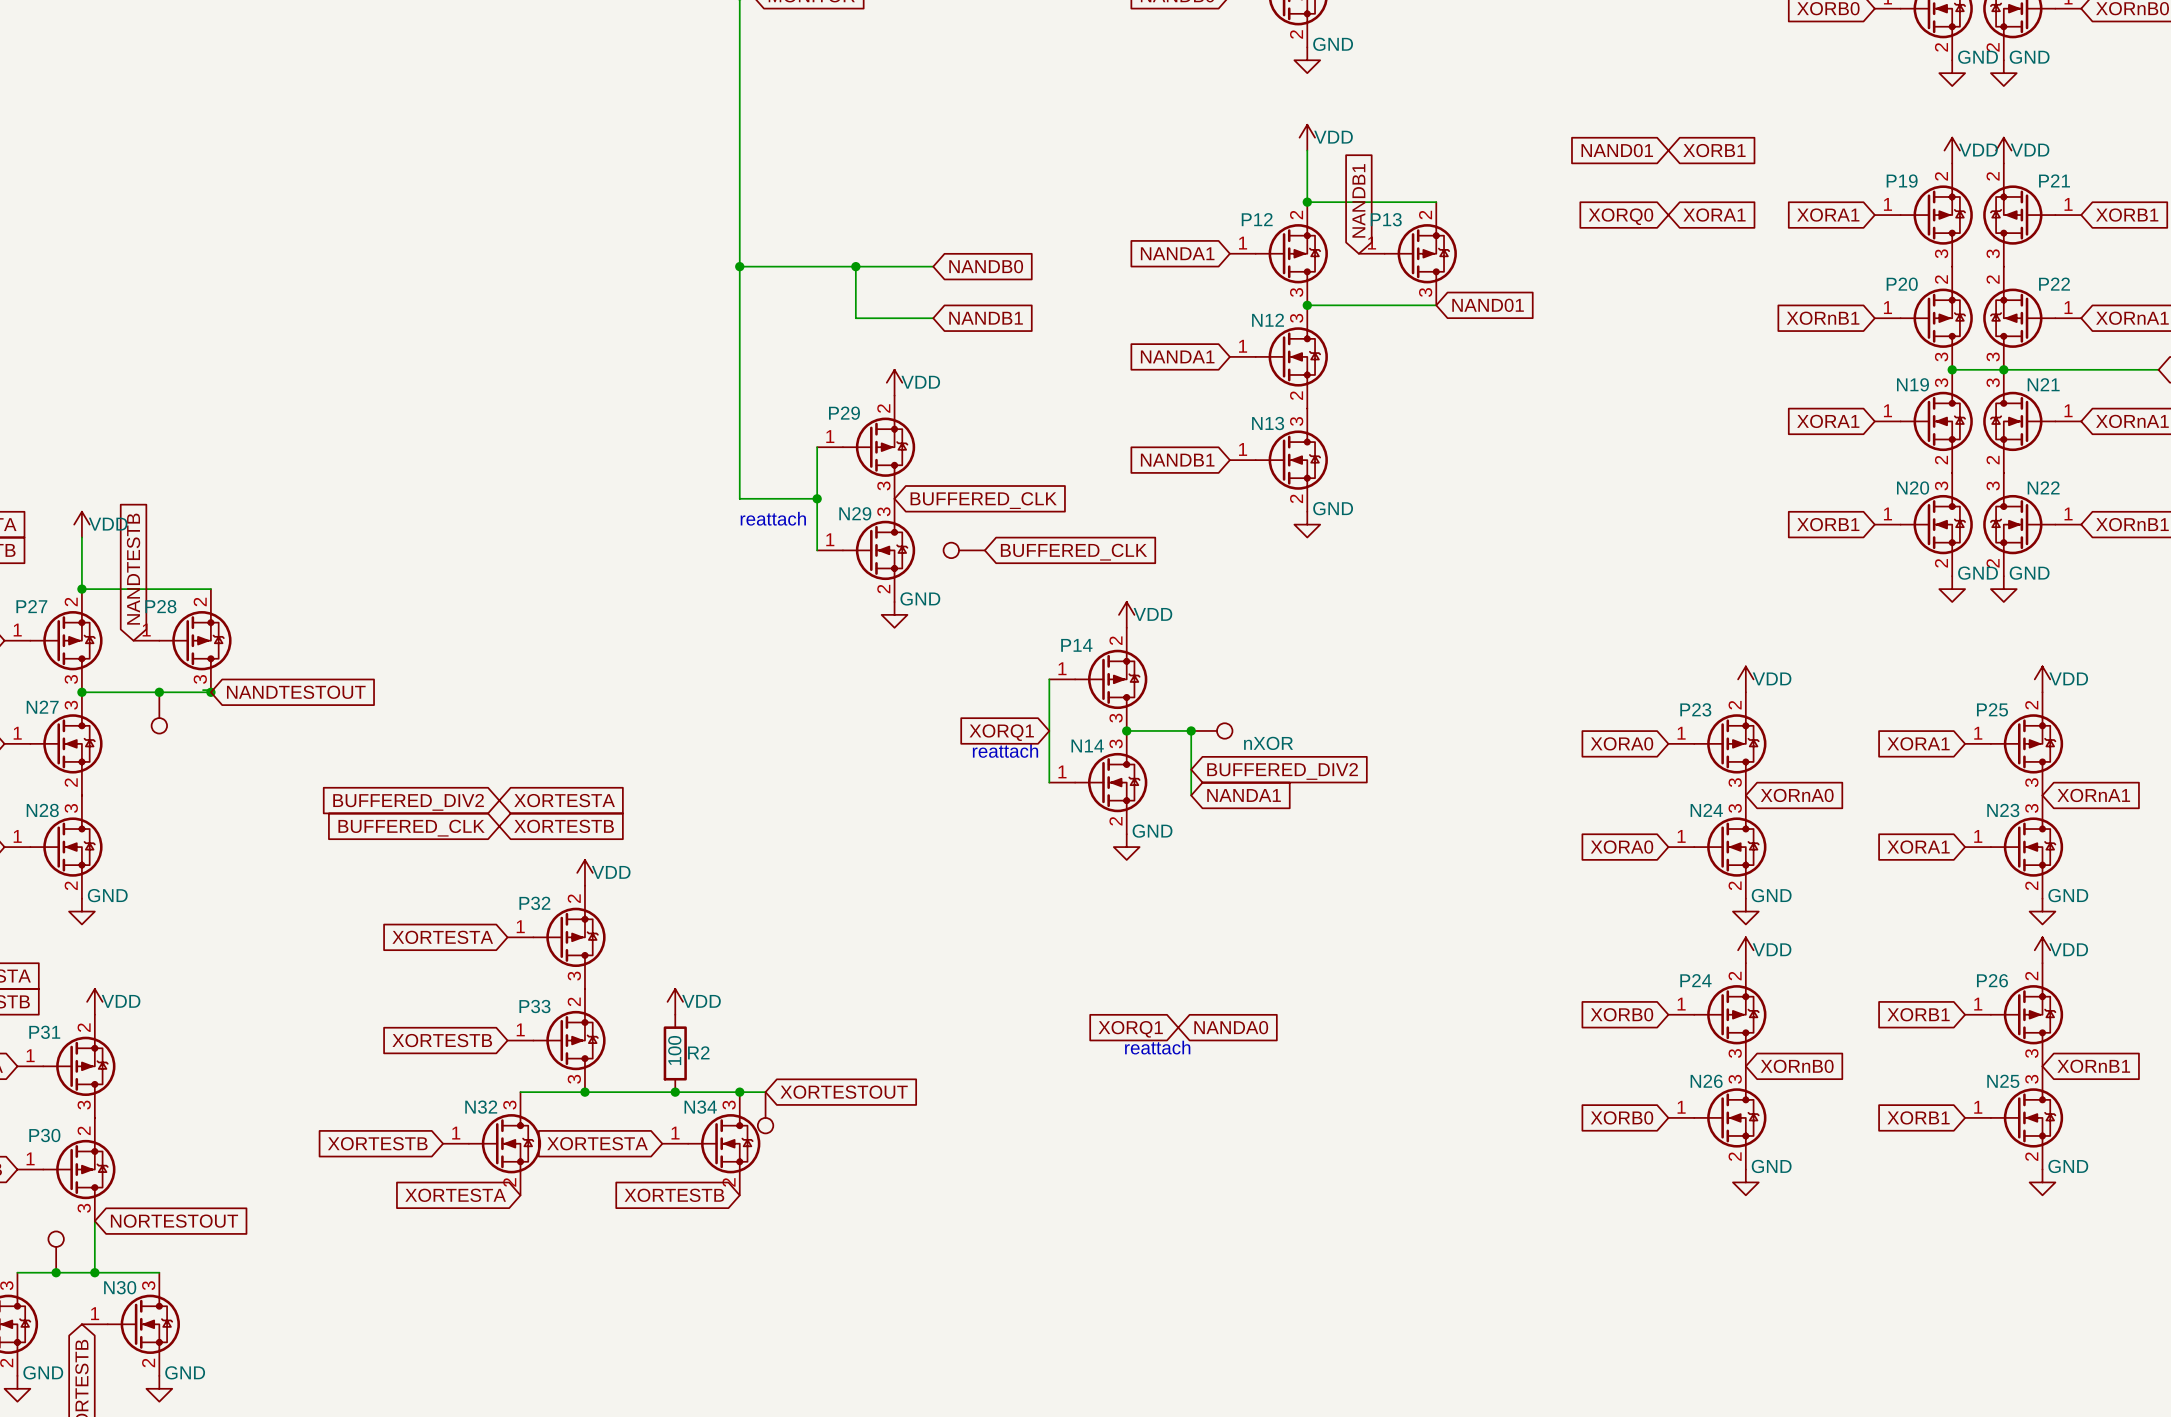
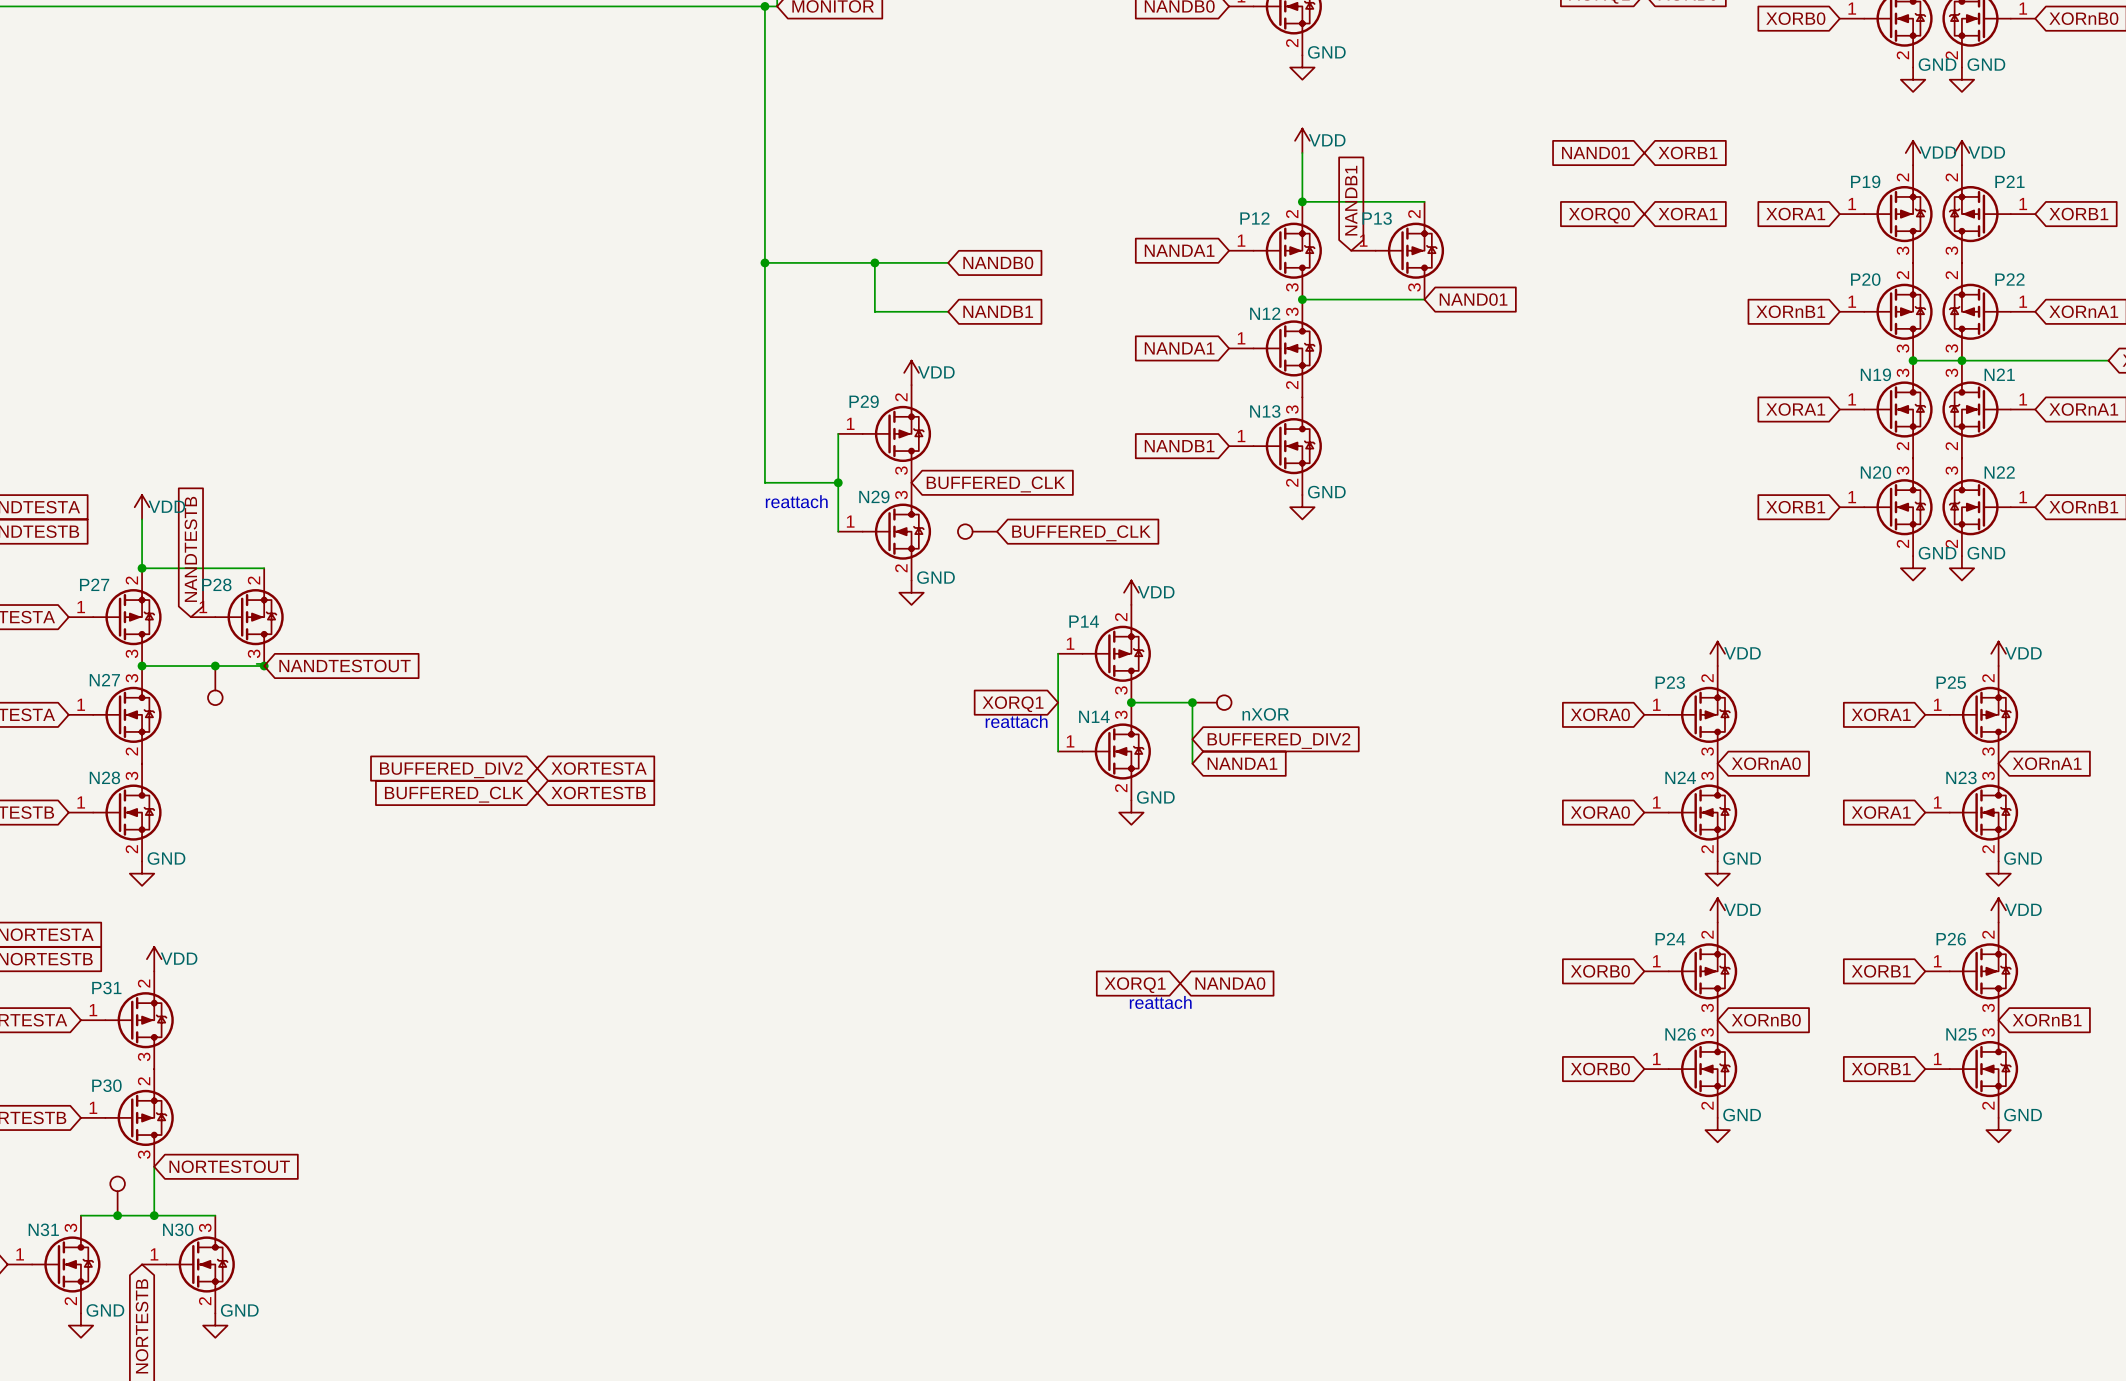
power symbol: VDD (584, 872) -> none
global label: XORTESTA (442, 937) -> none
P32: (556, 937) -> none
power symbol: VDD (675, 1001) -> none
global label: XORTESTB (442, 1040) -> none
P33: (556, 1040) -> none
R2: 100 (675, 1053) -> none
wire: (520, 1092) (765, 1092) -> none
junction: (584, 1092) -> none
junction: (675, 1092) -> none
junction: (739, 1092) -> none
global label: XORTESTOUT (844, 1092) -> none
part: (765, 1112) -> none
global label: XORTESTB (377, 1143) -> none
N32: (492, 1143) -> none
global label: XORTESTA (597, 1143) -> none
N34: (711, 1143) -> none
global label: XORTESTA (455, 1195) -> none
global label: XORTESTB (674, 1195) -> none

